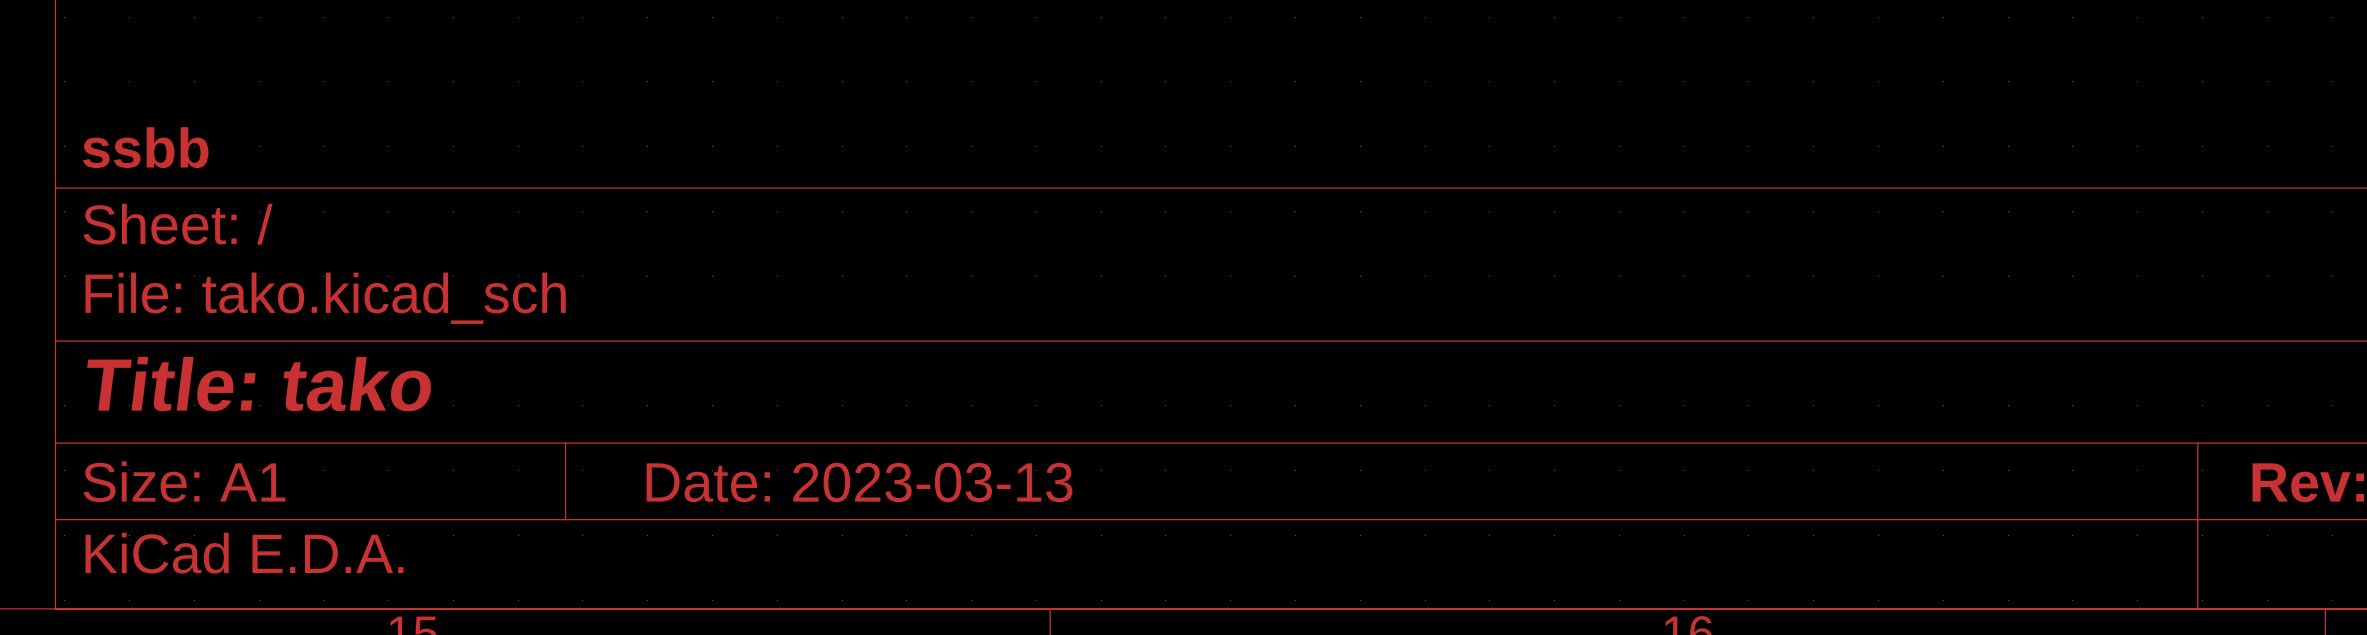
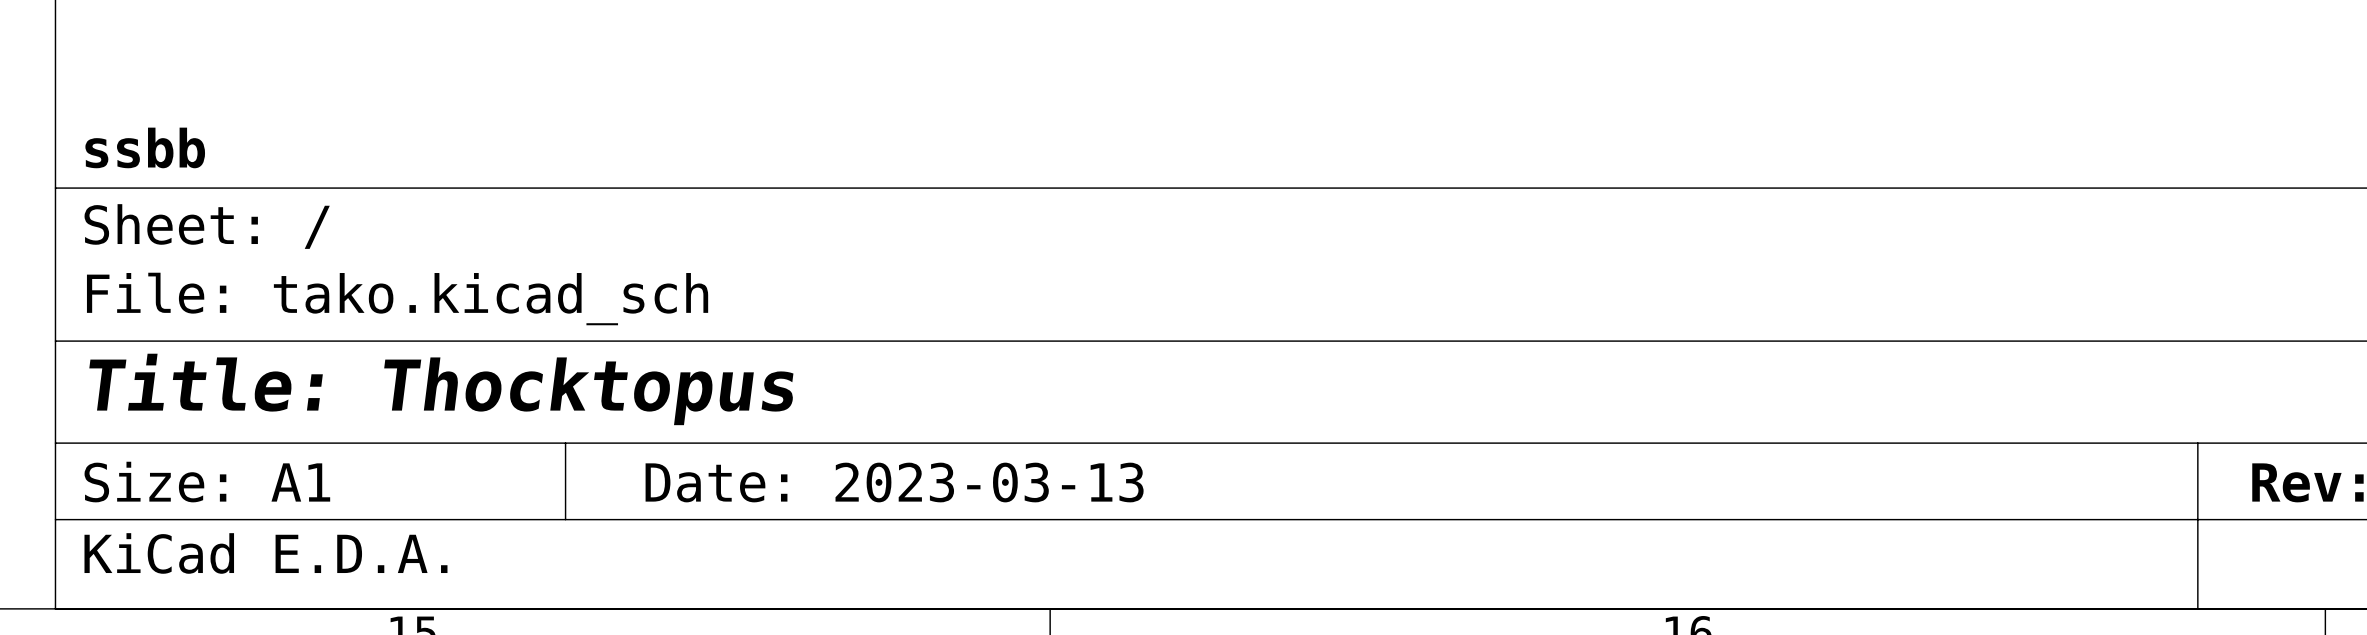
title block: Title: tako (259, 384) -> Title: Thocktopus (441, 389)

